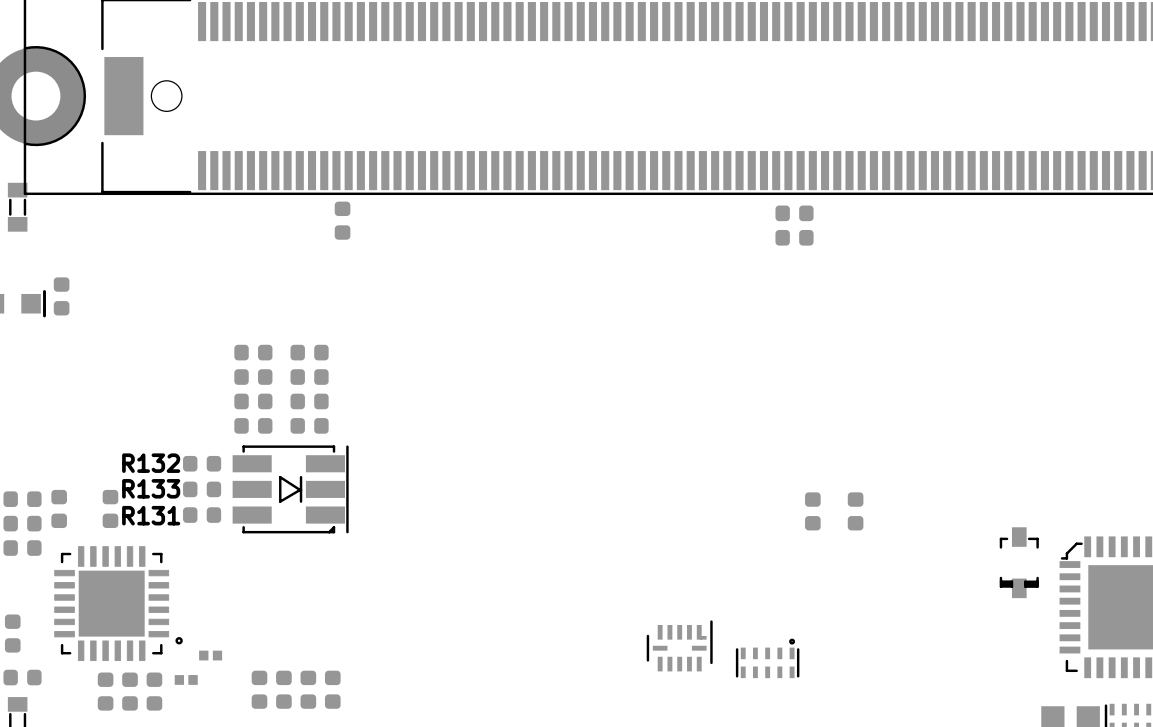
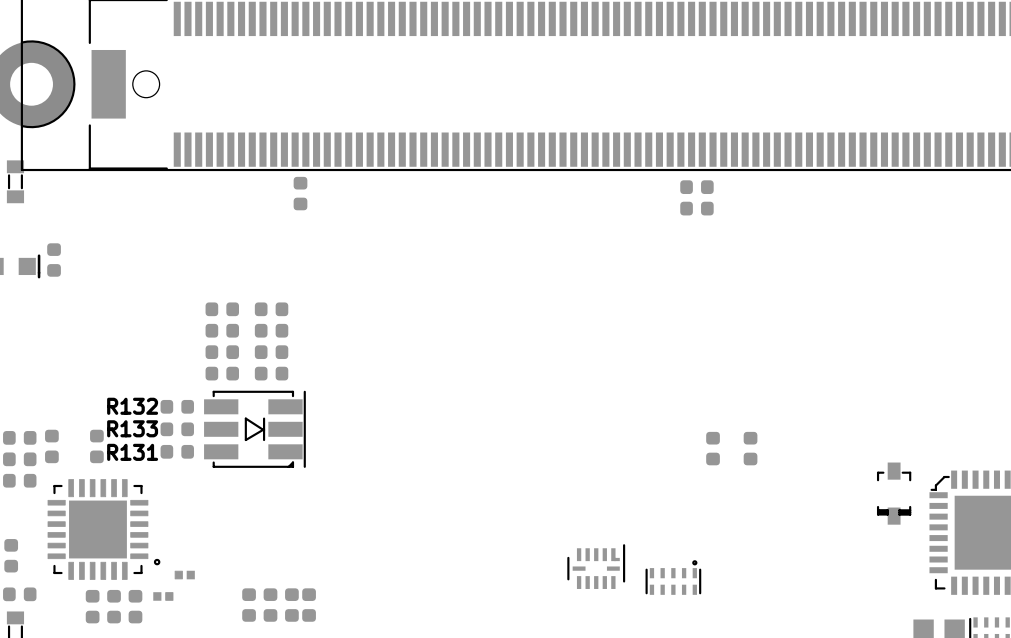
part position: (259, 689) -> (309, 605)

